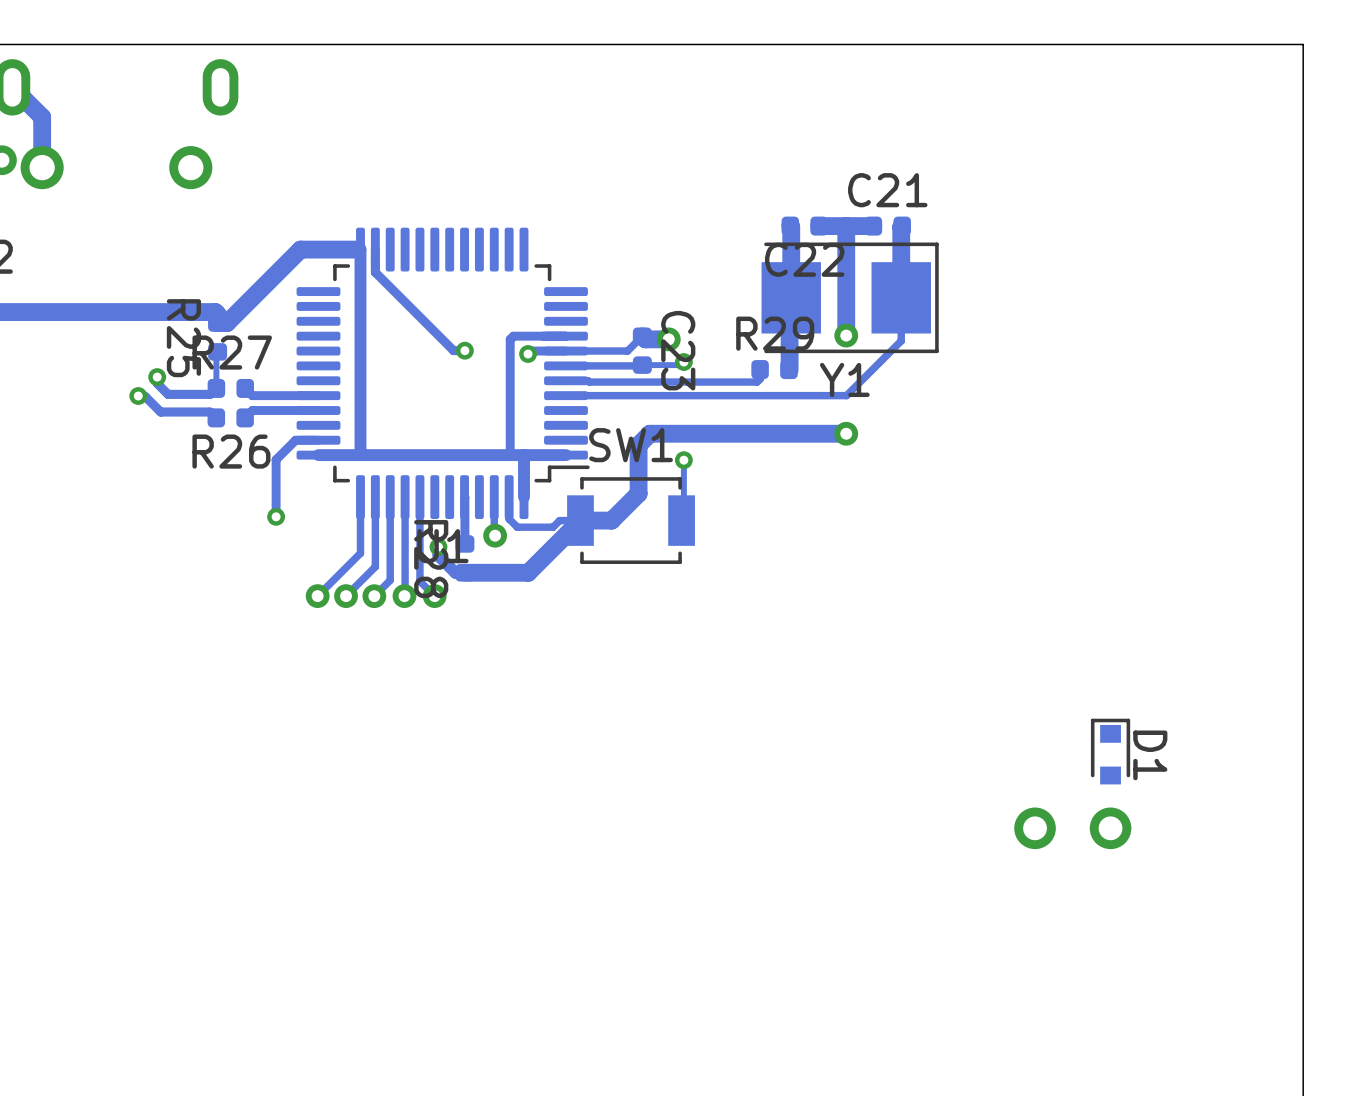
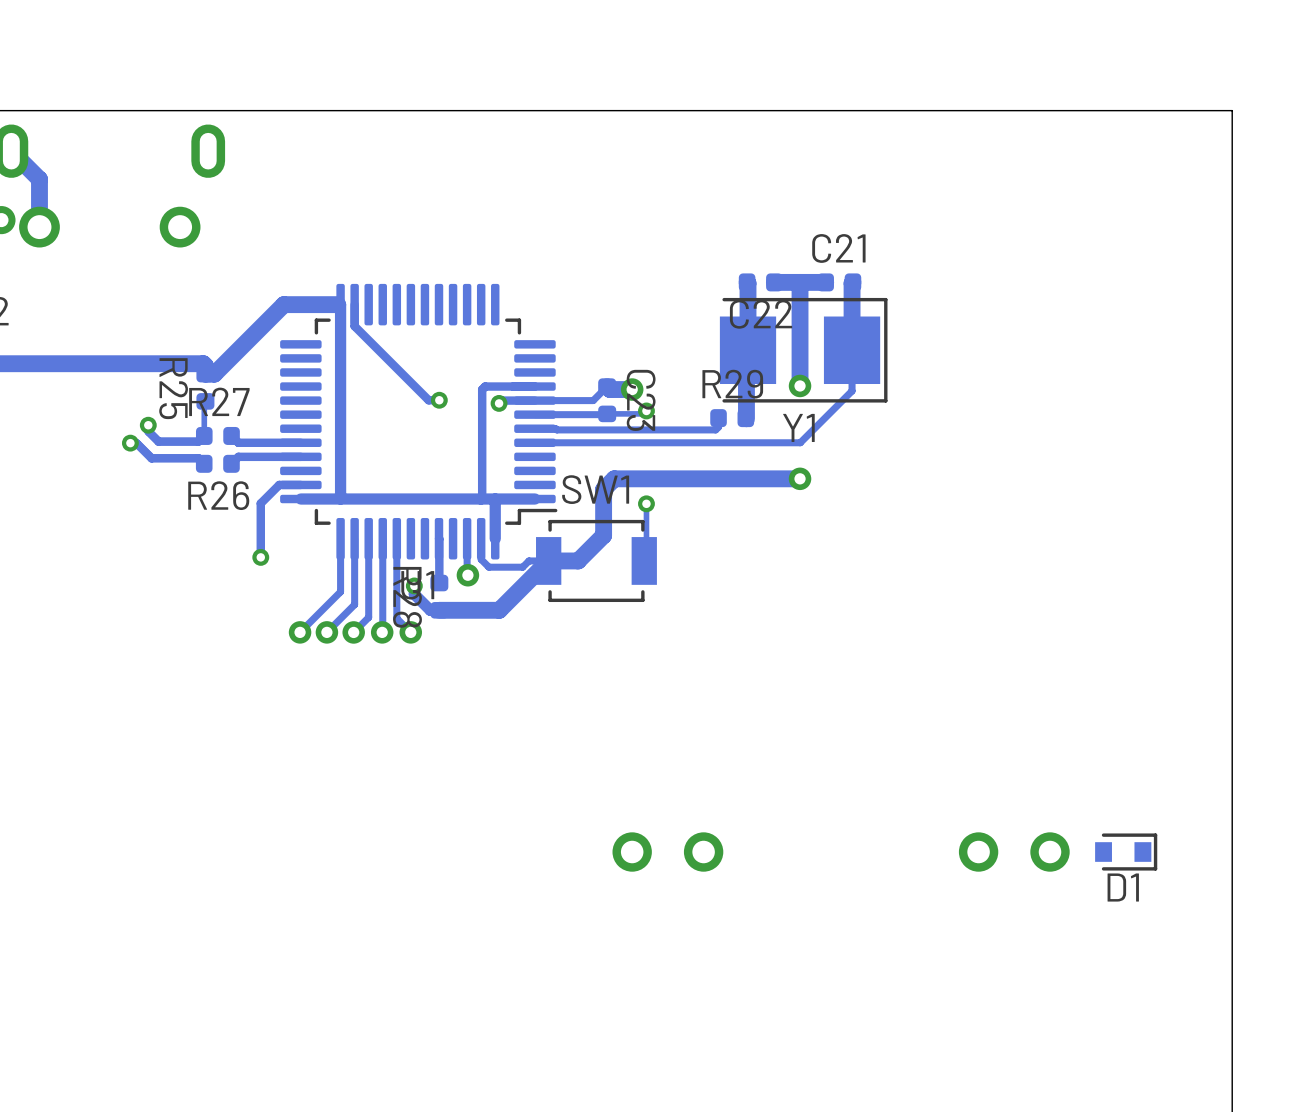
D1 rotation: 0° (1110, 751) -> 90° clockwise (1126, 852)
D1 position: (1110, 751) -> (1126, 852)
part: none -> (667, 852)

